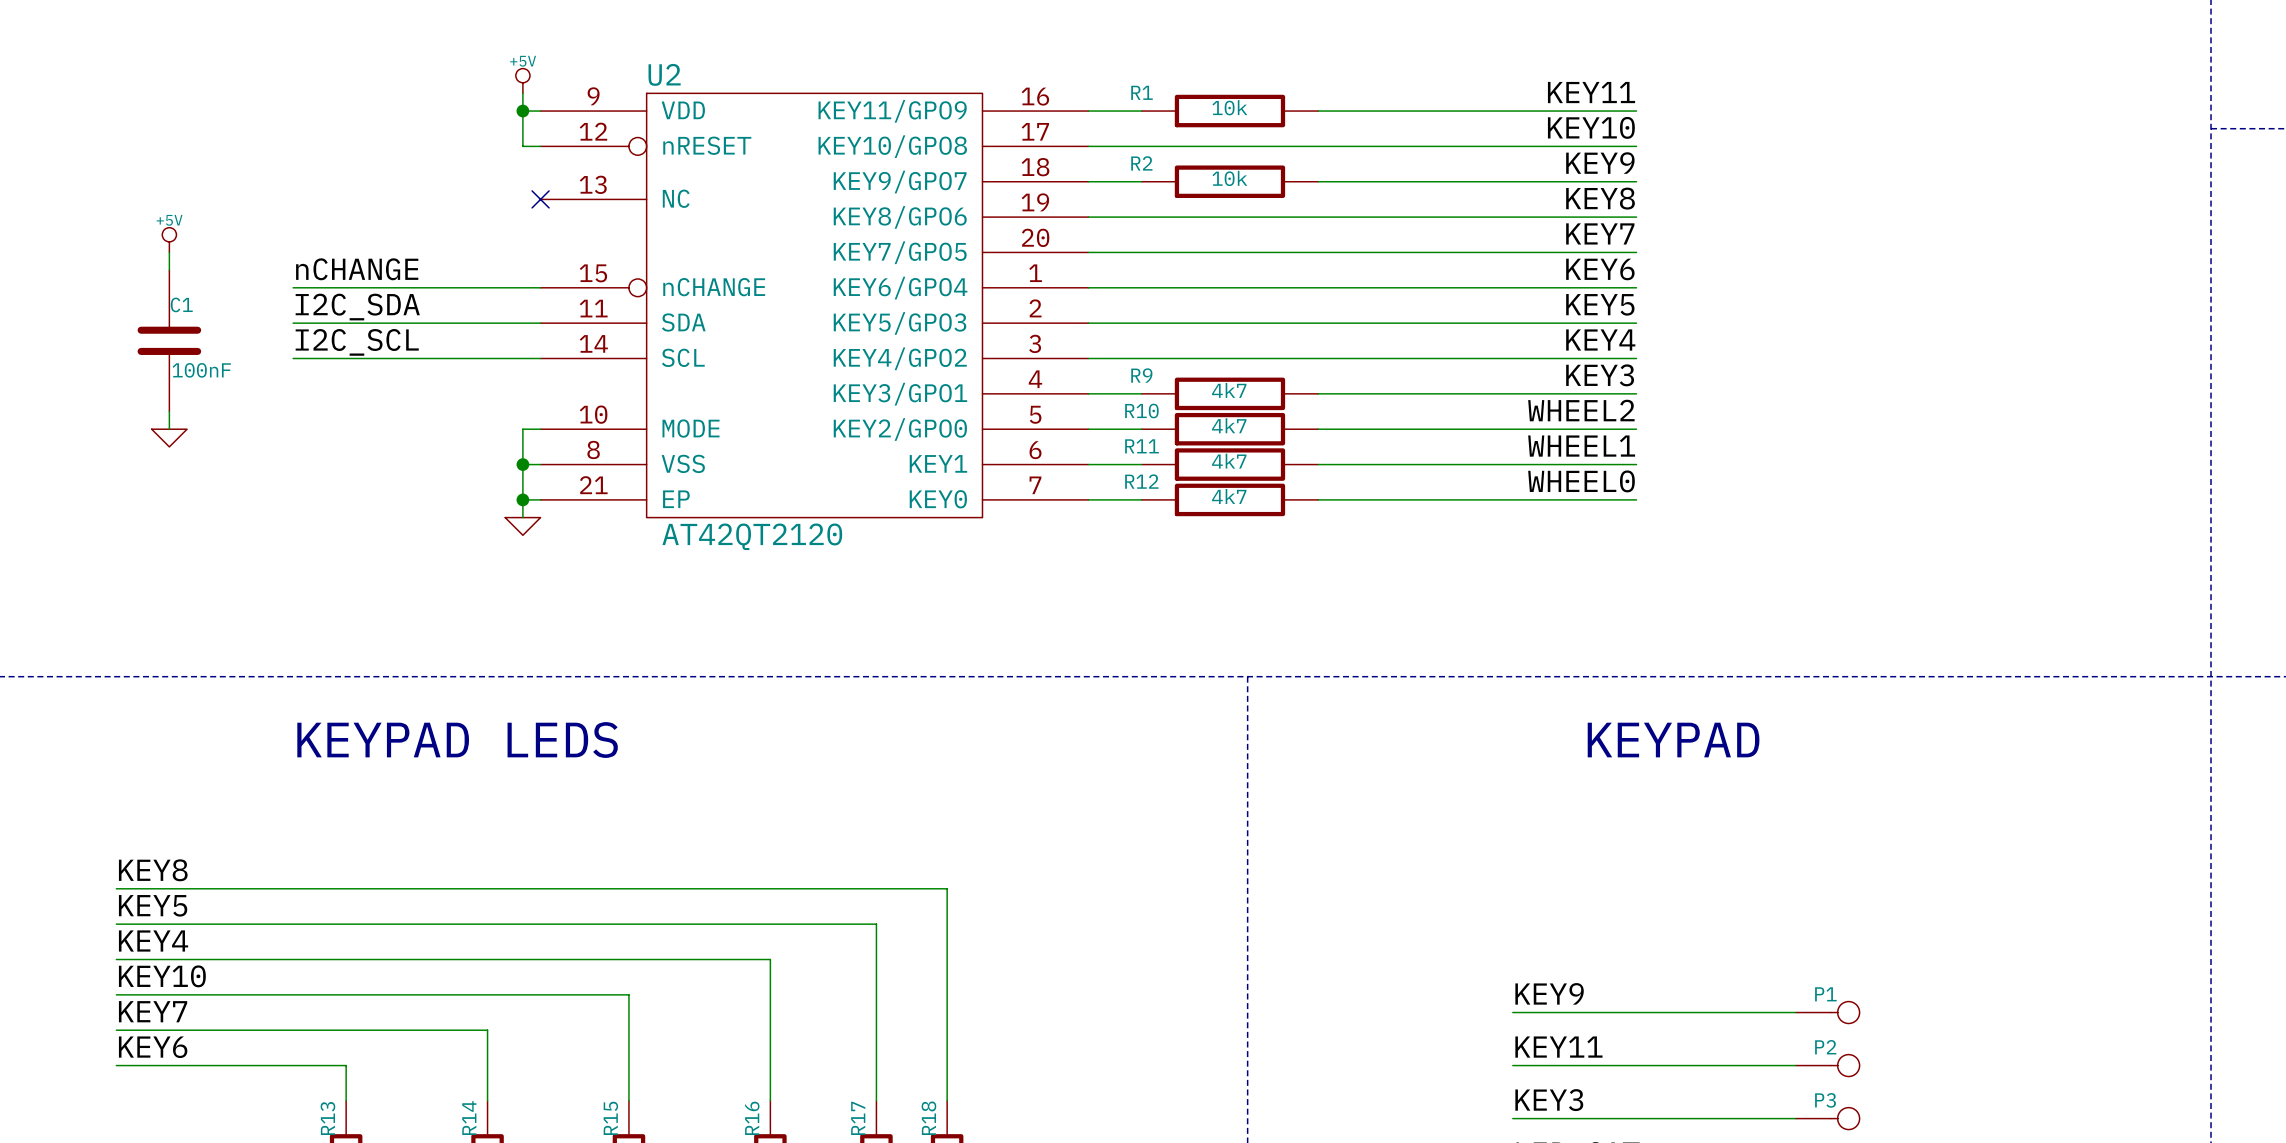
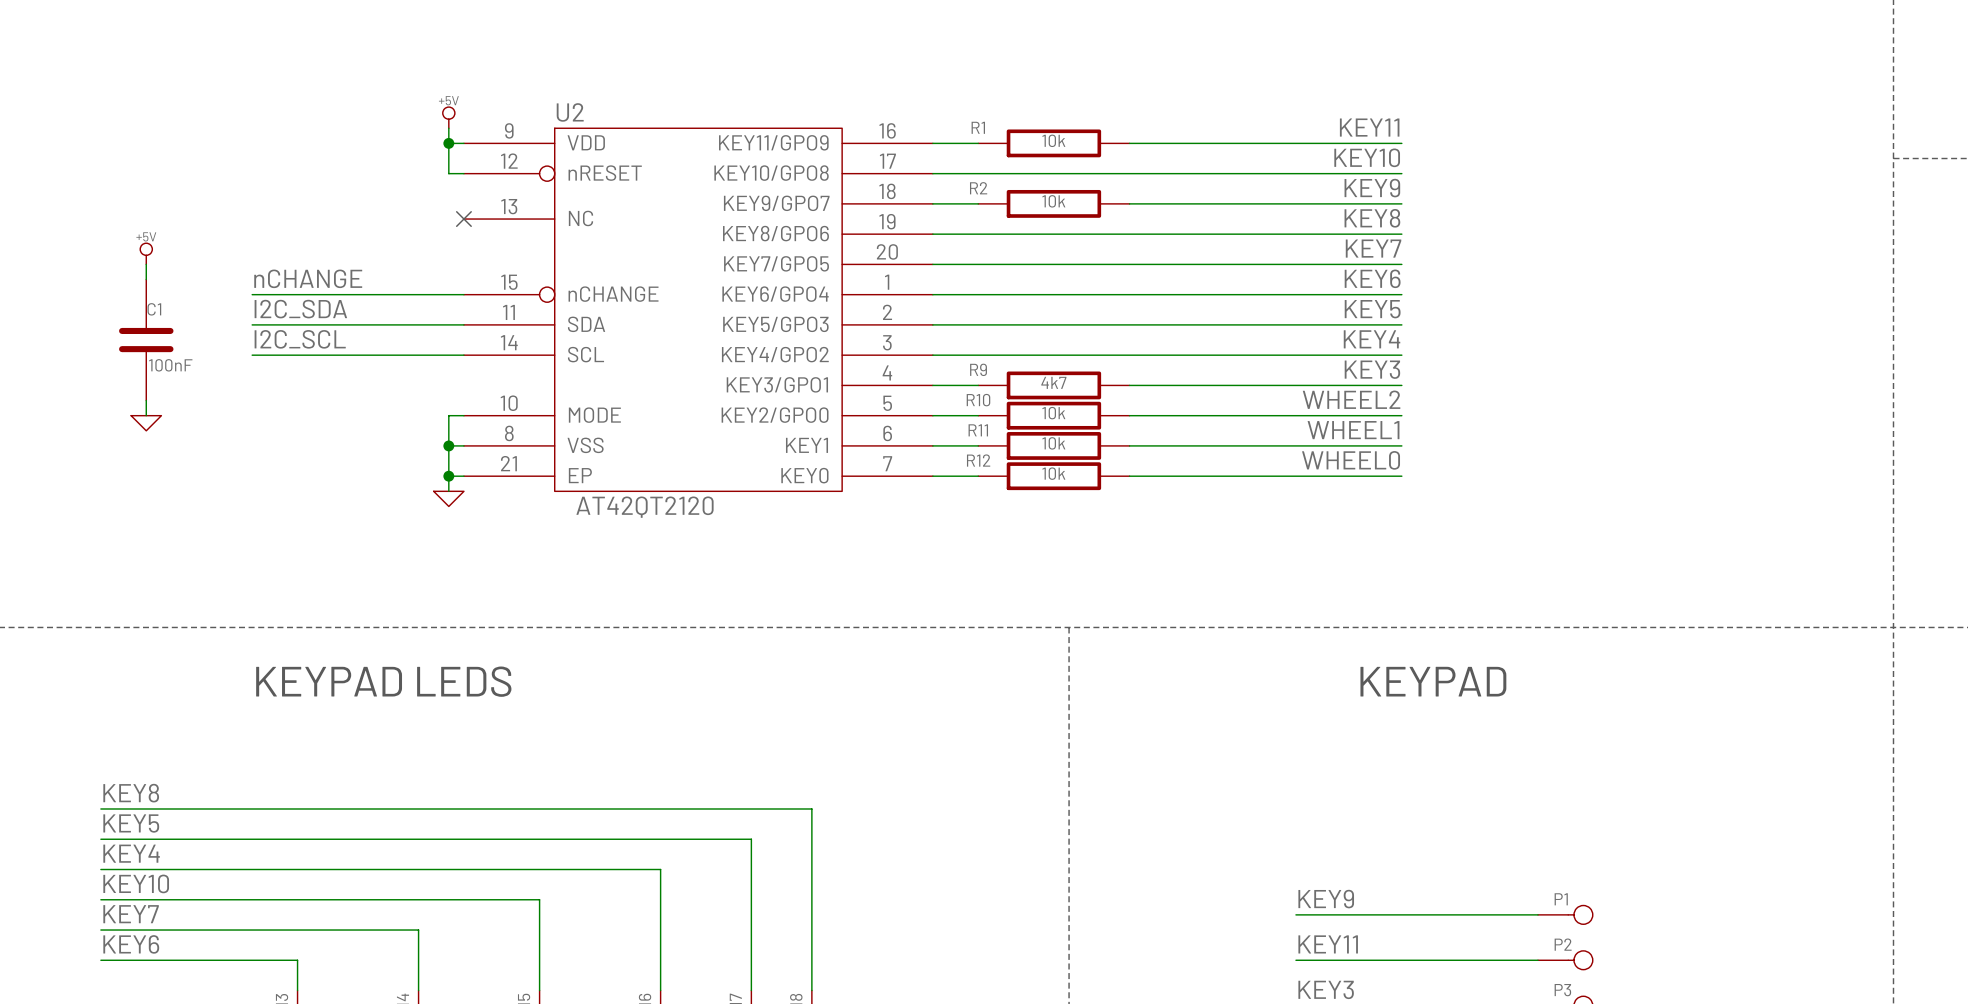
R10 value: 4k7 (1229, 425) -> 10k (1053, 413)
R11 value: 4k7 (1229, 461) -> 10k (1053, 443)
R12 value: 4k7 (1229, 496) -> 10k (1053, 473)

